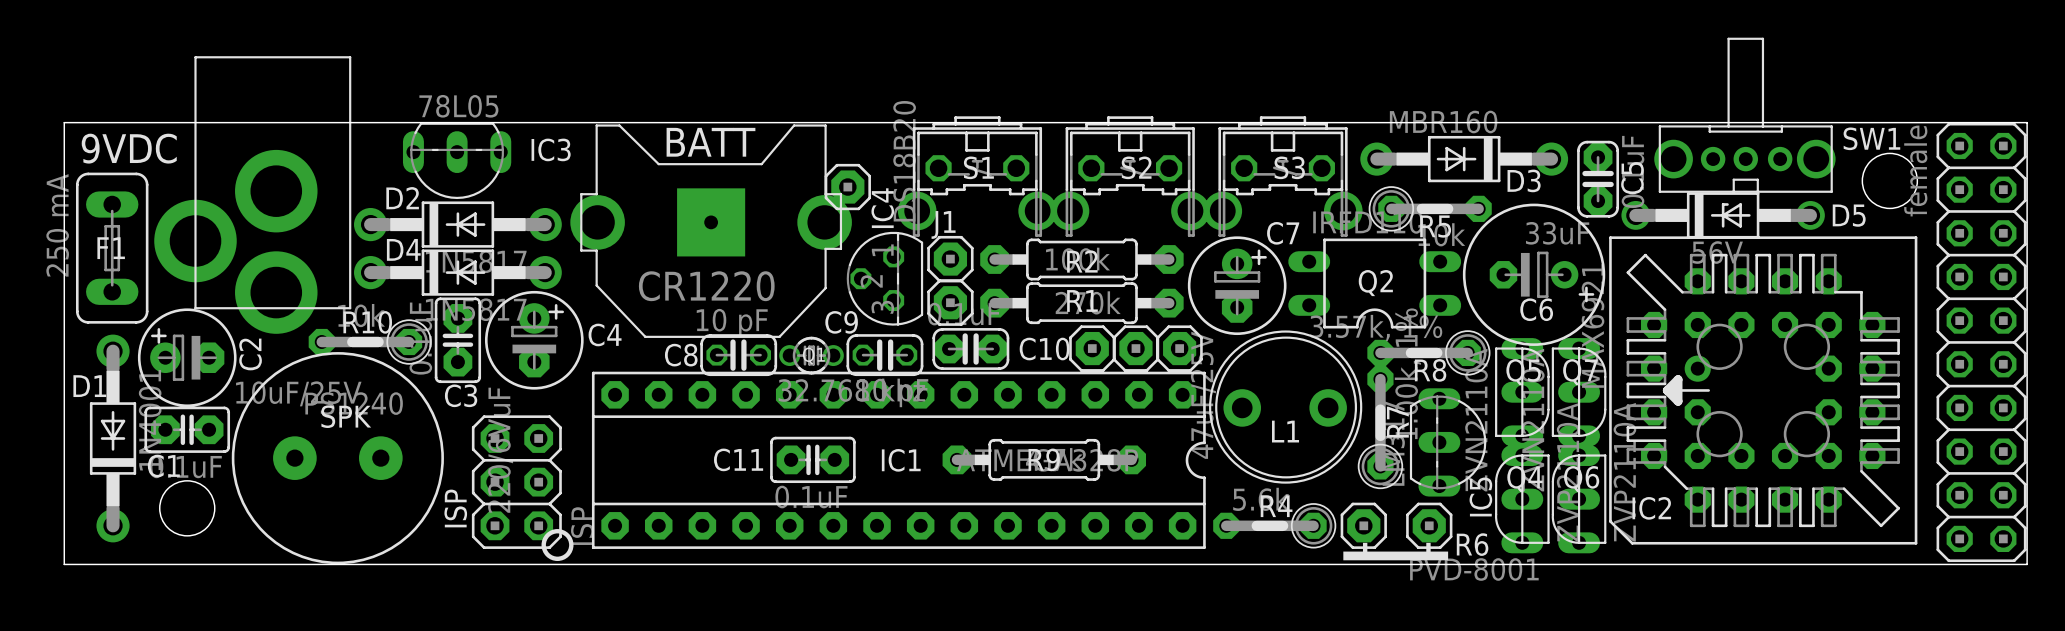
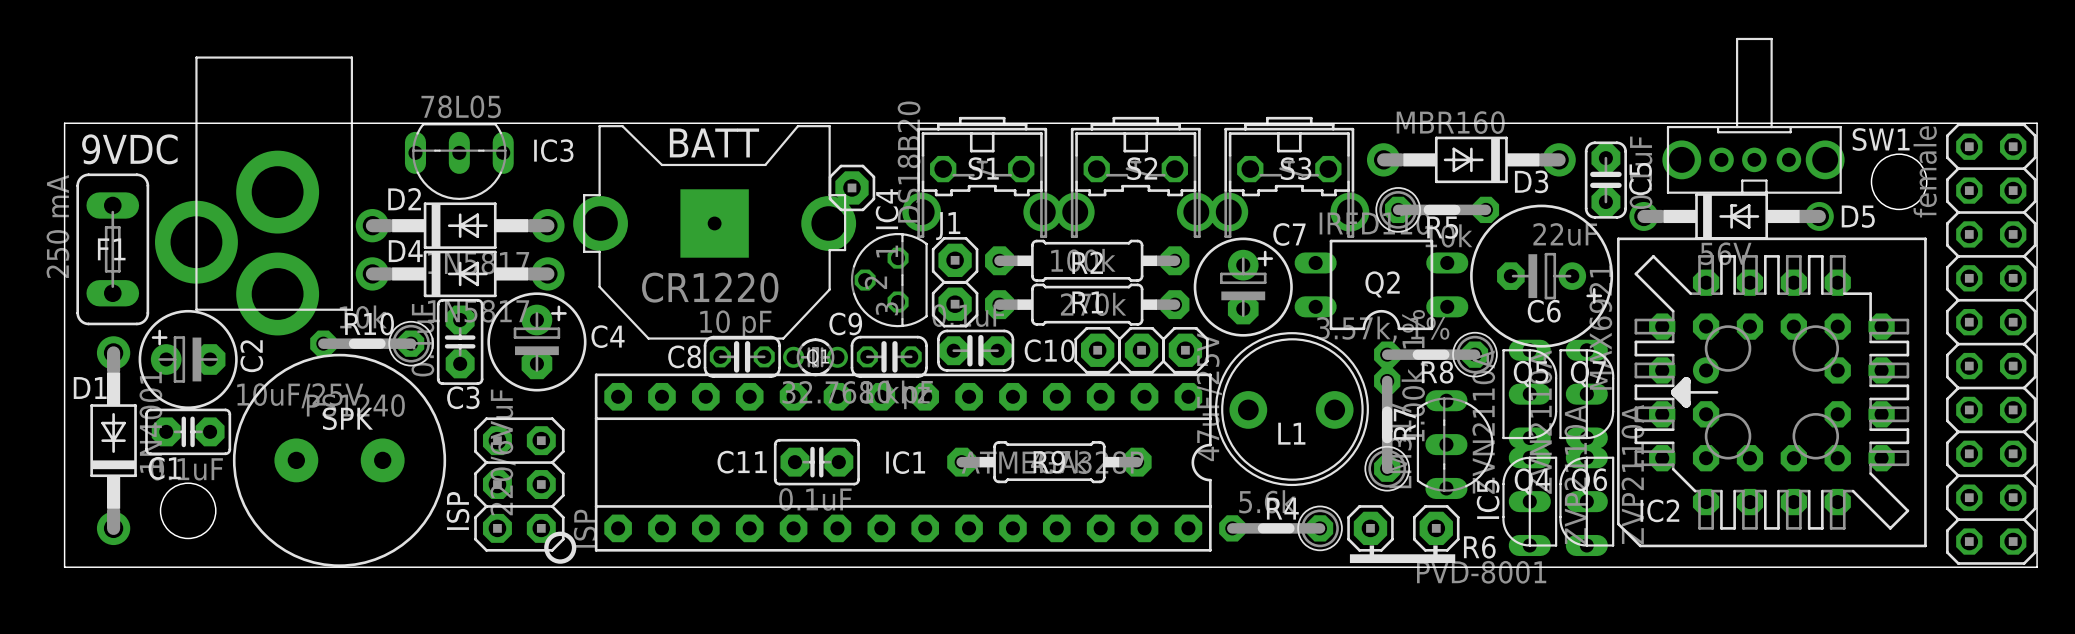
C6 value: 33uF (1557, 233) -> 22uF (1565, 234)

